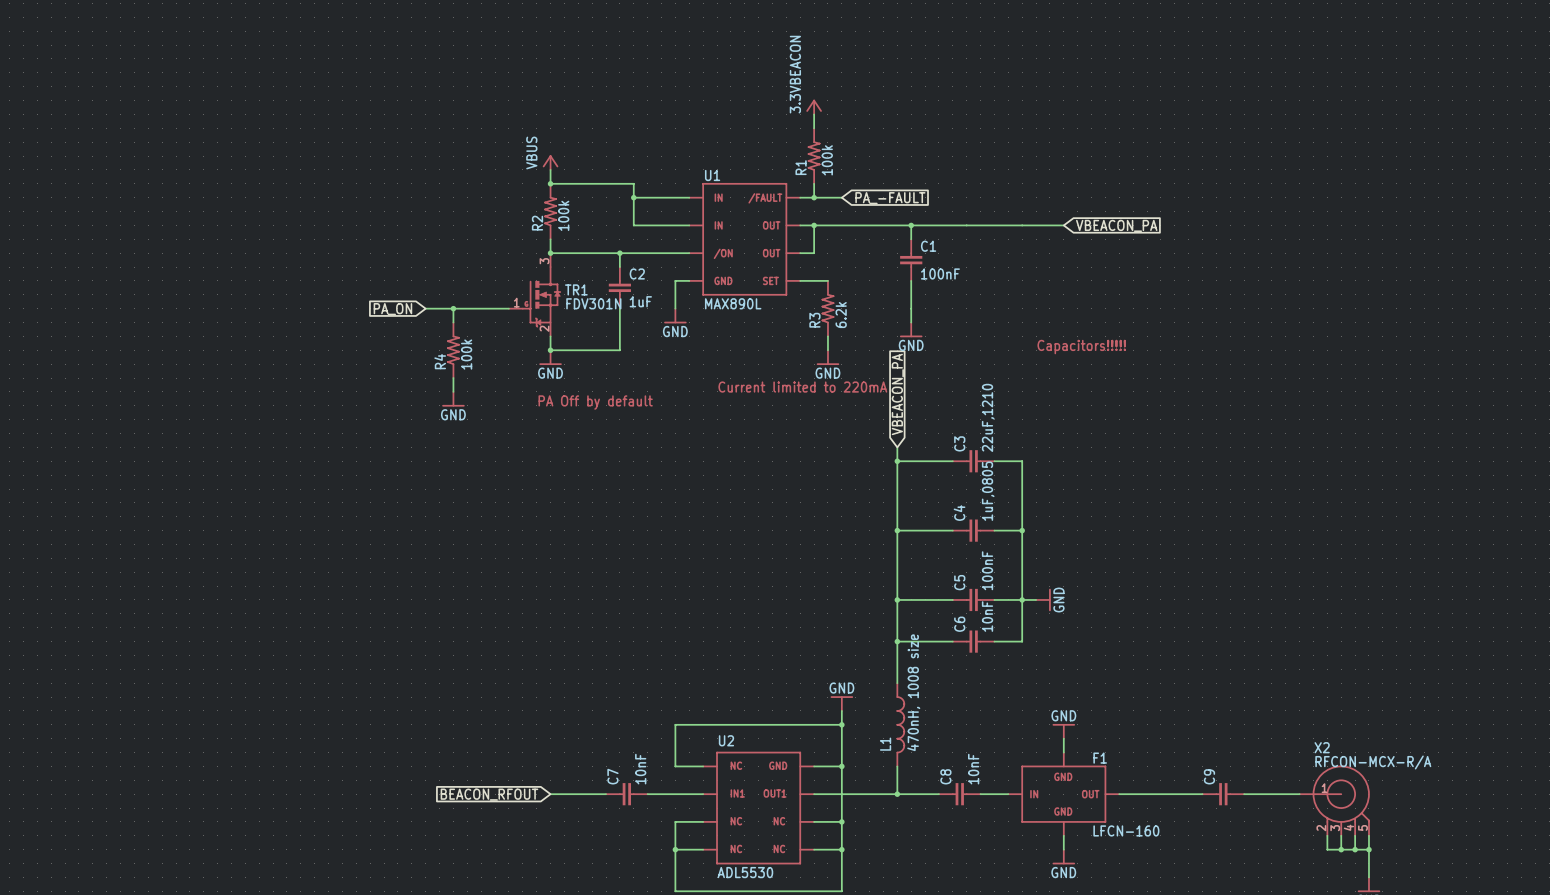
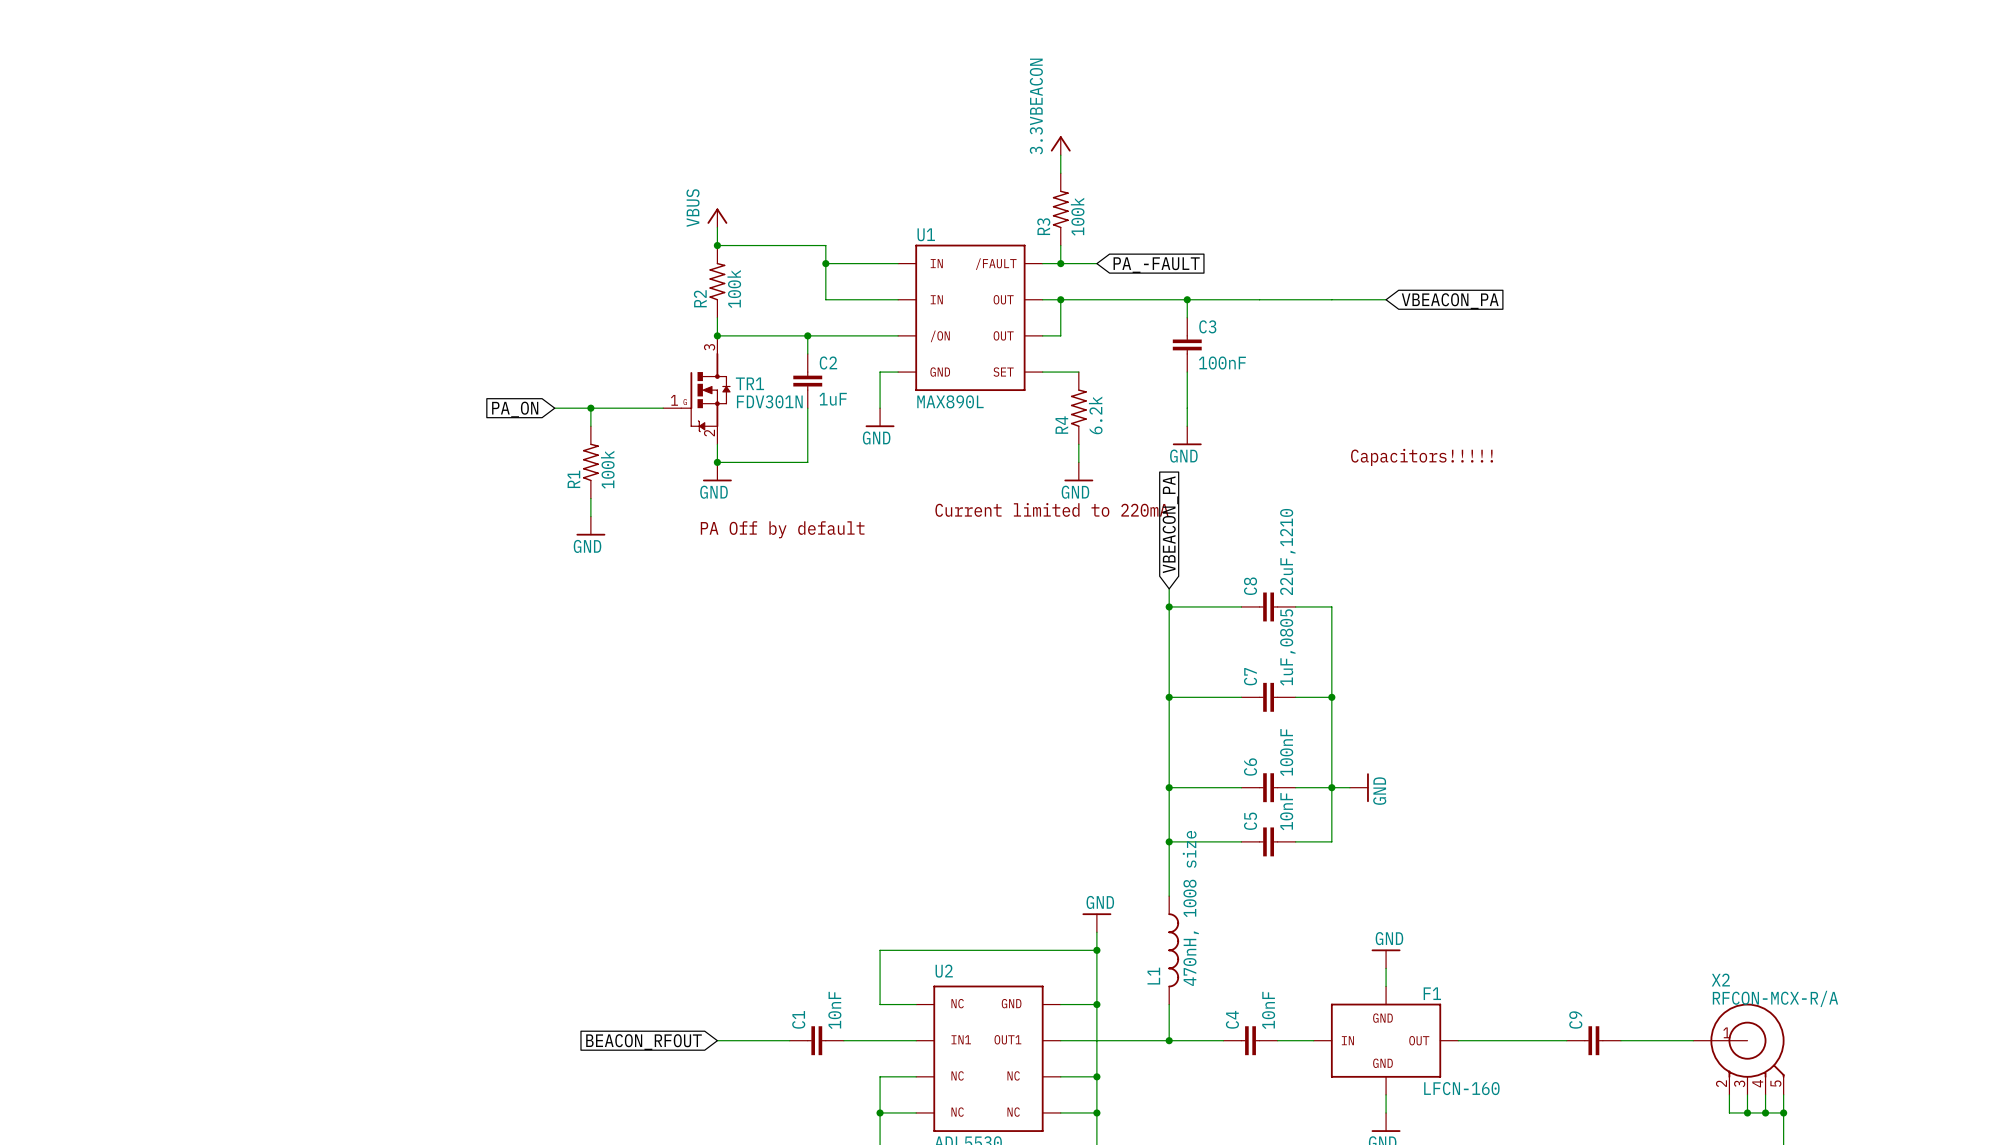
R1 name: R1 (801, 167) -> R3 (1043, 226)
C1 name: C1 (928, 246) -> C3 (1207, 326)
R3 name: R3 (814, 320) -> R4 (1061, 425)
R4 name: R4 (440, 361) -> R1 (573, 479)
C3 name: C3 (959, 443) -> C8 (1250, 586)
C4 name: C4 (959, 513) -> C7 (1250, 676)
C5 name: C5 (959, 582) -> C6 (1250, 767)
C6 name: C6 (959, 624) -> C5 (1250, 821)
C7 name: C7 (612, 776) -> C1 (798, 1019)
C8 name: C8 (945, 776) -> C4 (1232, 1019)

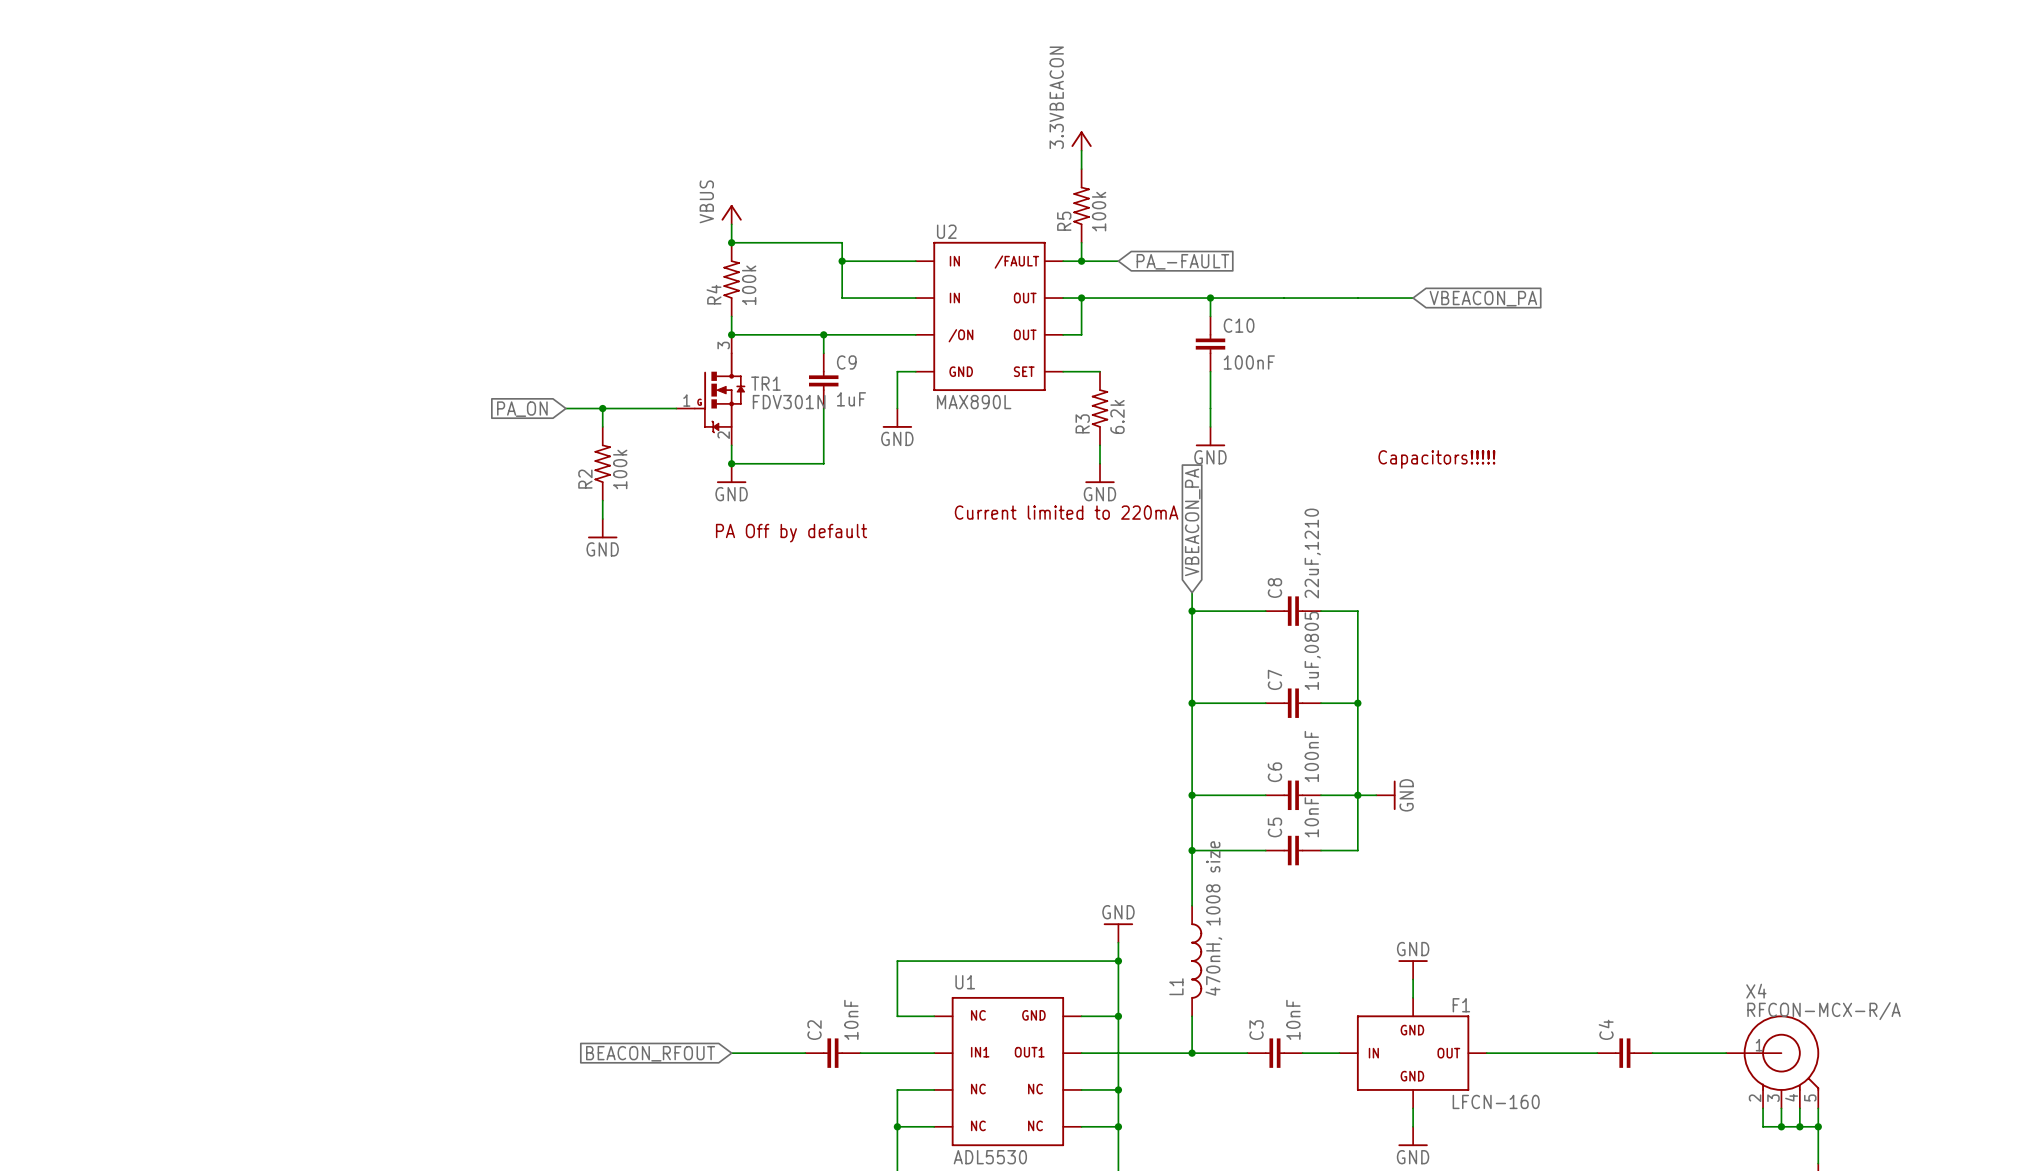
R3 name: R3 (1043, 226) -> R5 (1064, 221)
U1 name: U1 (926, 234) -> U2 (946, 231)
R2 name: R2 (700, 298) -> R4 (714, 294)
C3 name: C3 (1207, 326) -> C10 (1239, 325)
C2 name: C2 (828, 363) -> C9 (846, 362)
R4 name: R4 (1061, 425) -> R3 (1082, 423)
R1 name: R1 (573, 479) -> R2 (585, 479)
U2 name: U2 (944, 971) -> U1 (965, 982)
X2 name: X2 (1720, 980) -> X4 (1756, 991)
C1 name: C1 (798, 1019) -> C2 (814, 1030)
C4 name: C4 (1232, 1019) -> C3 (1256, 1030)
C9 name: C9 (1575, 1020) -> C4 (1606, 1029)

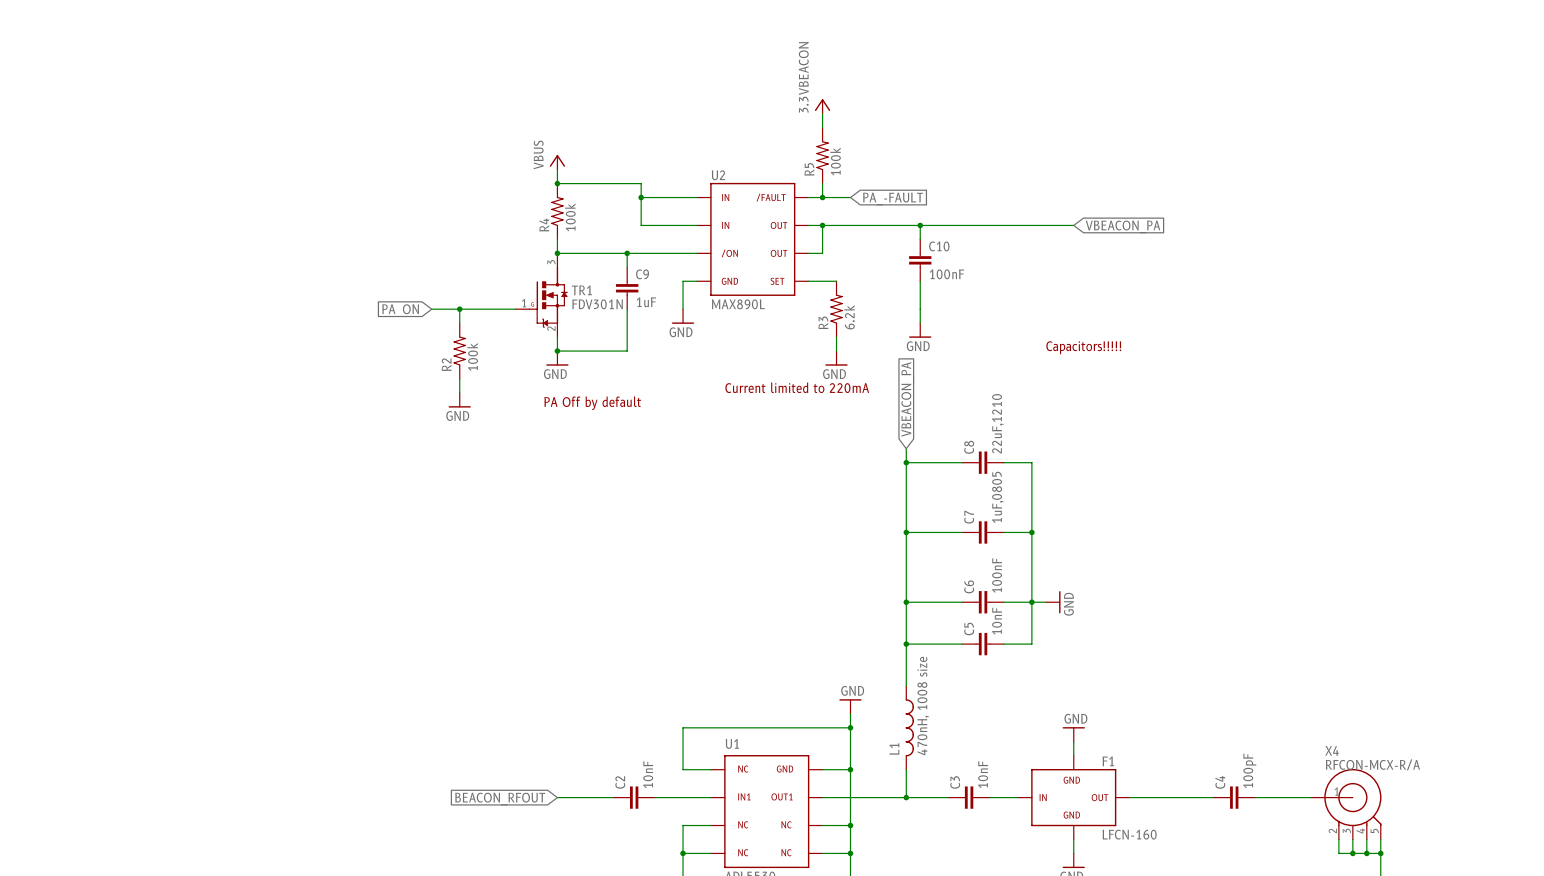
C4 value: none -> 100pF (1249, 770)

